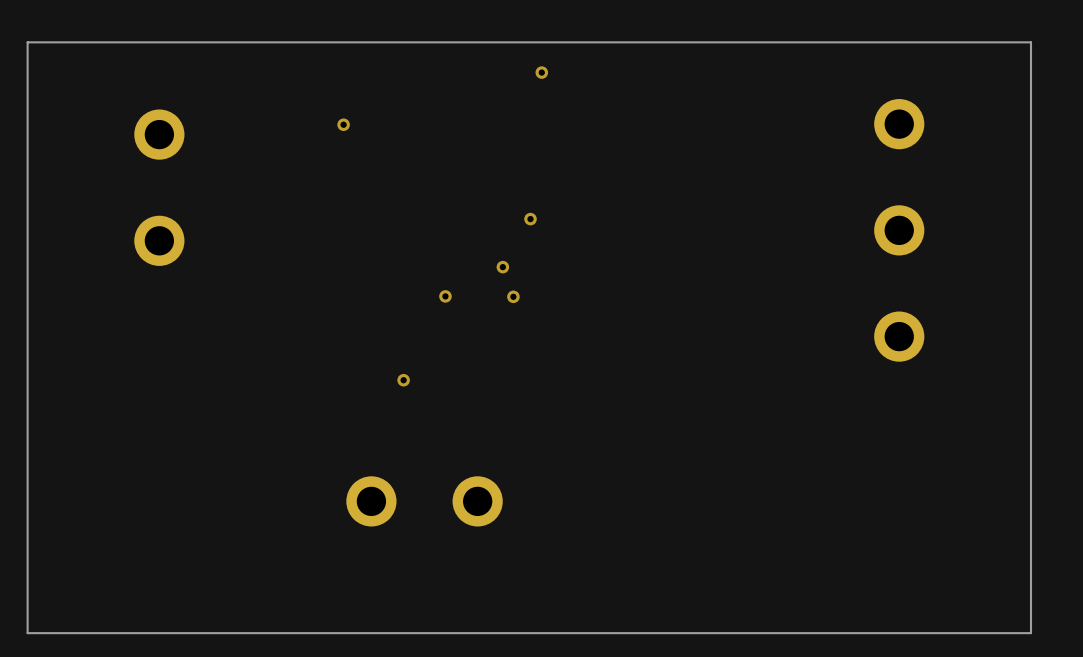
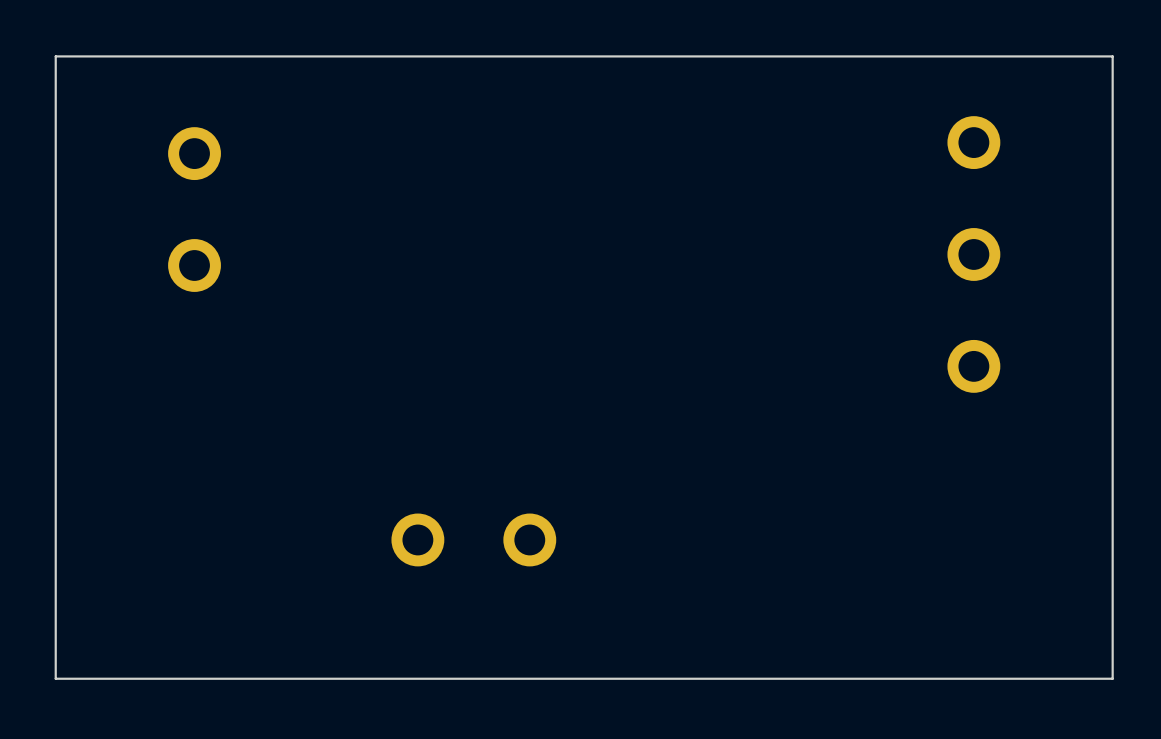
via: (541, 72) -> none
via: (343, 124) -> none
via: (530, 219) -> none
via: (502, 267) -> none
via: (445, 296) -> none
via: (513, 296) -> none
via: (403, 380) -> none

